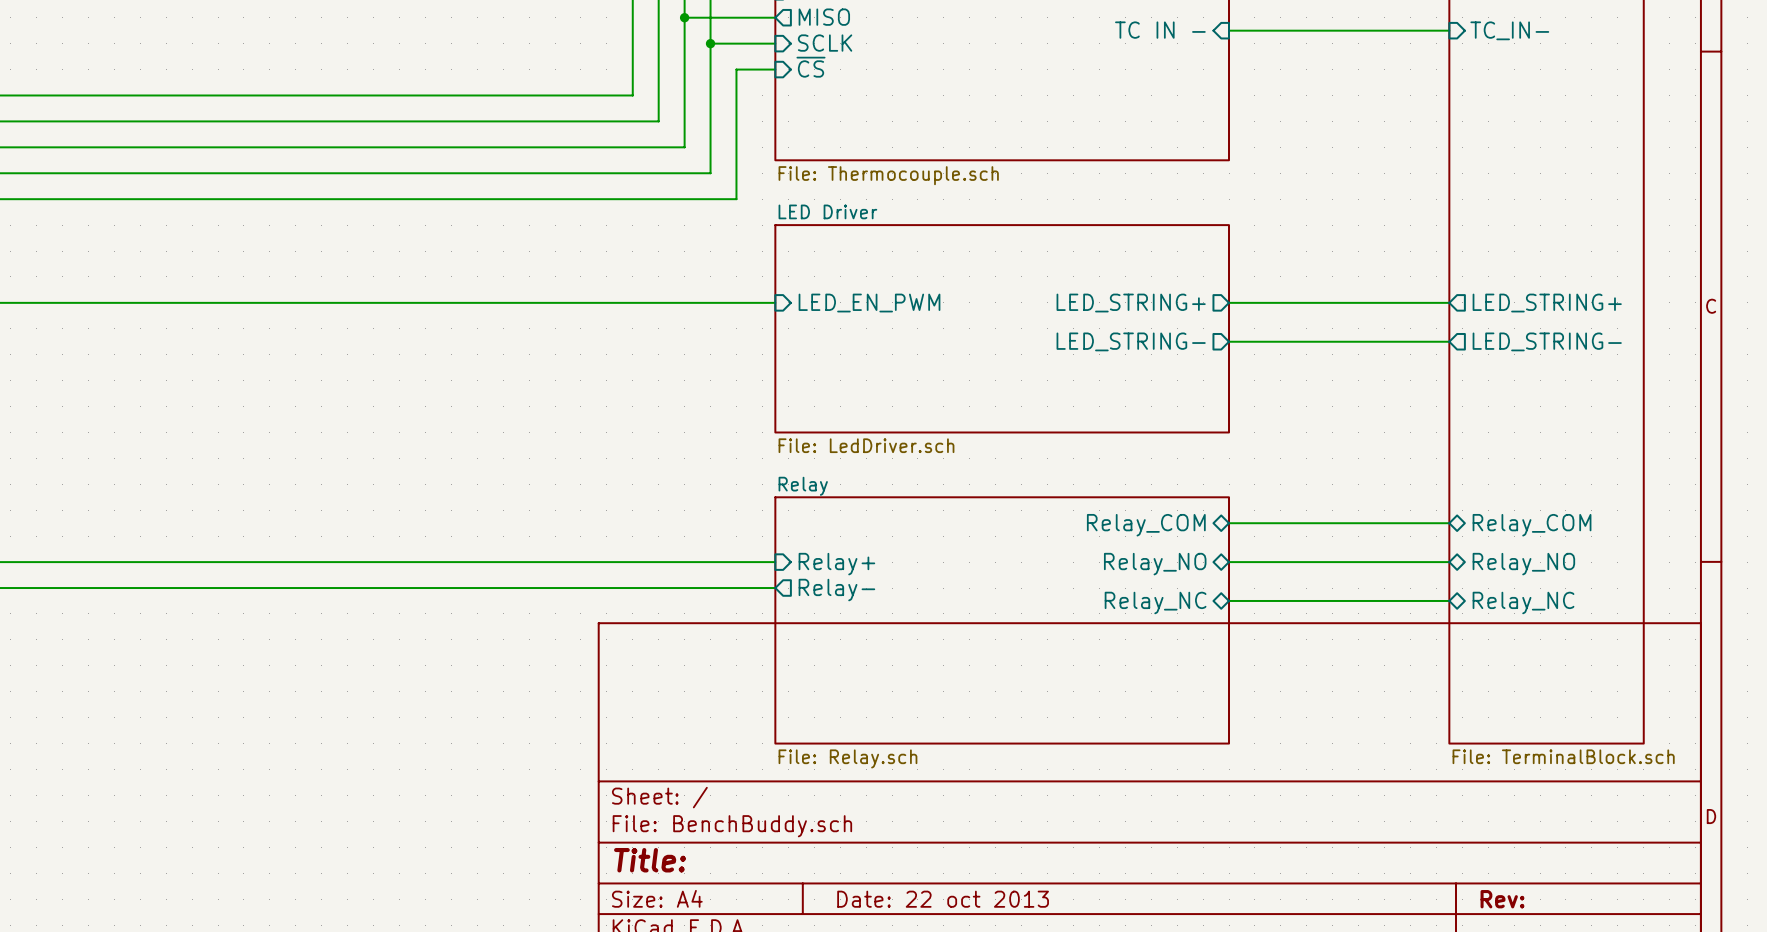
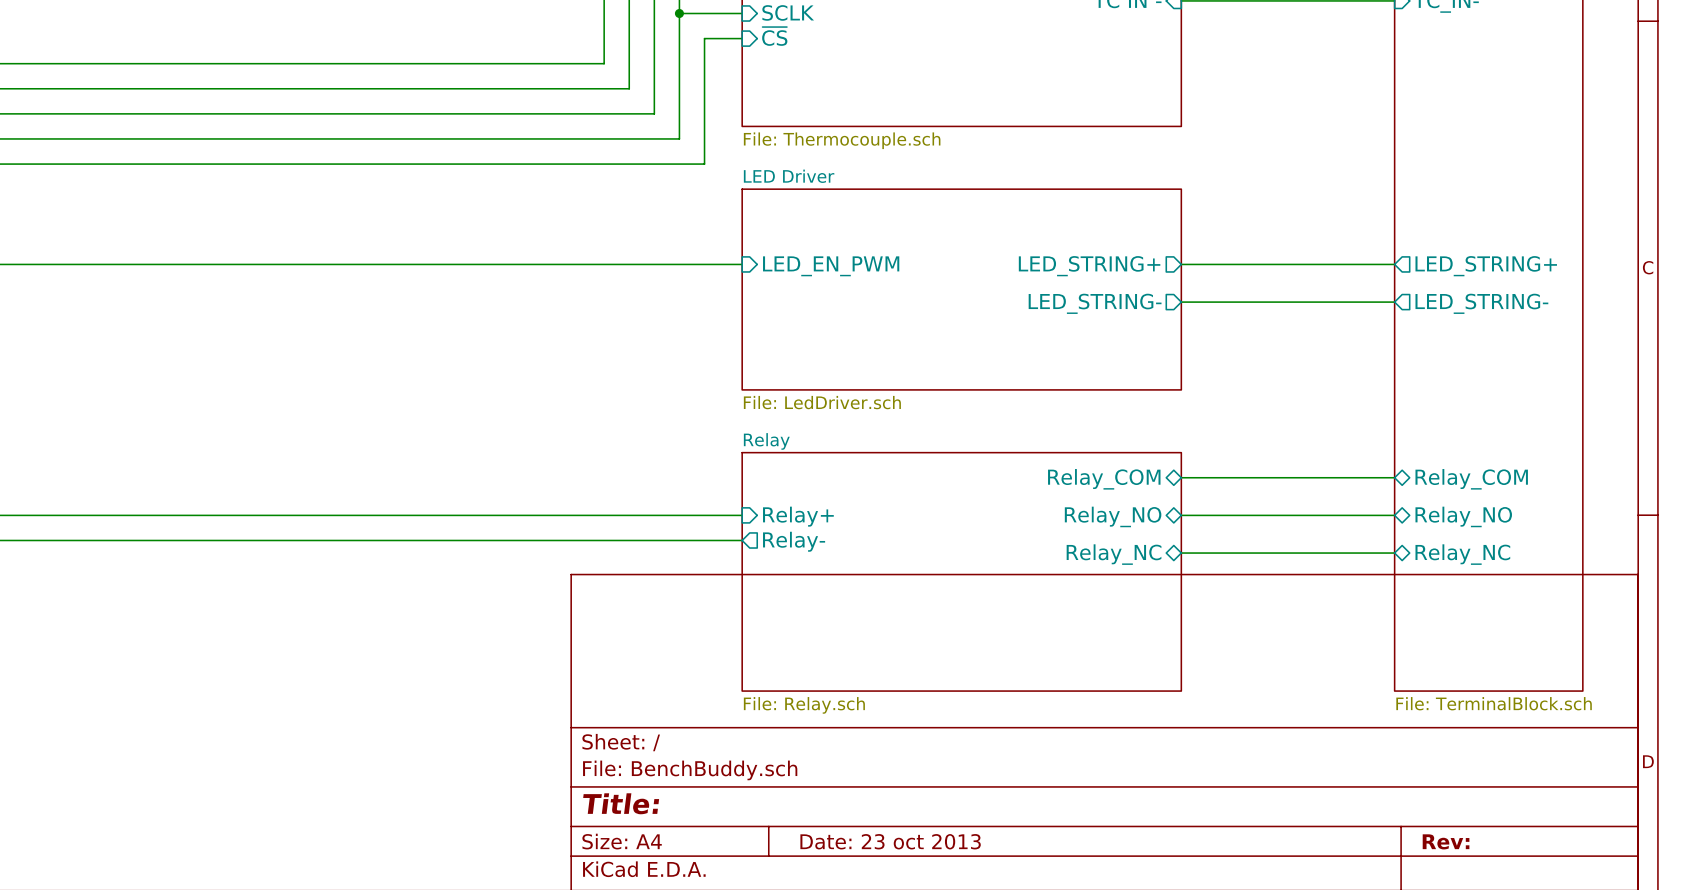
title block: Date: 22 oct 2013 (943, 899) -> Date: 23 oct 2013 (890, 841)

